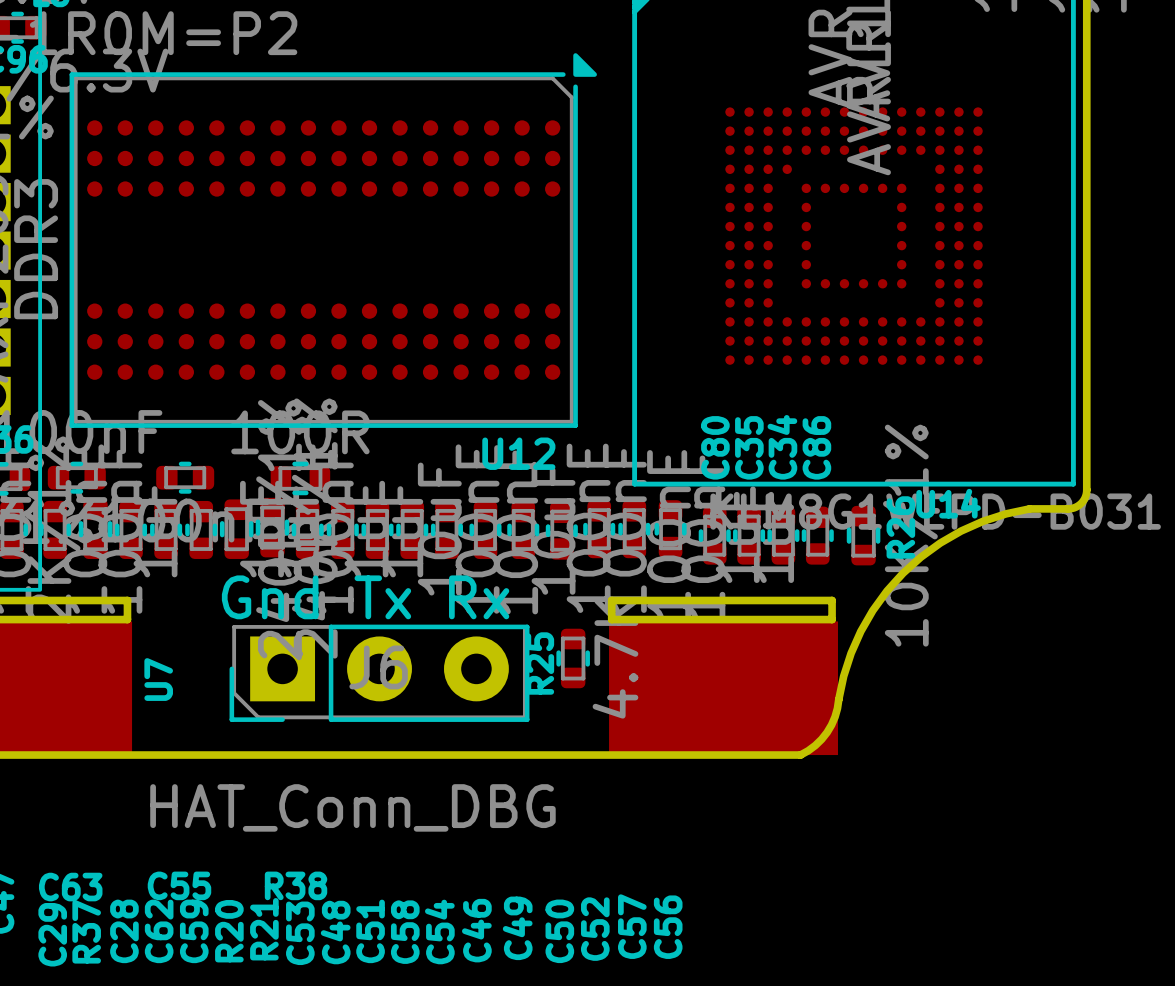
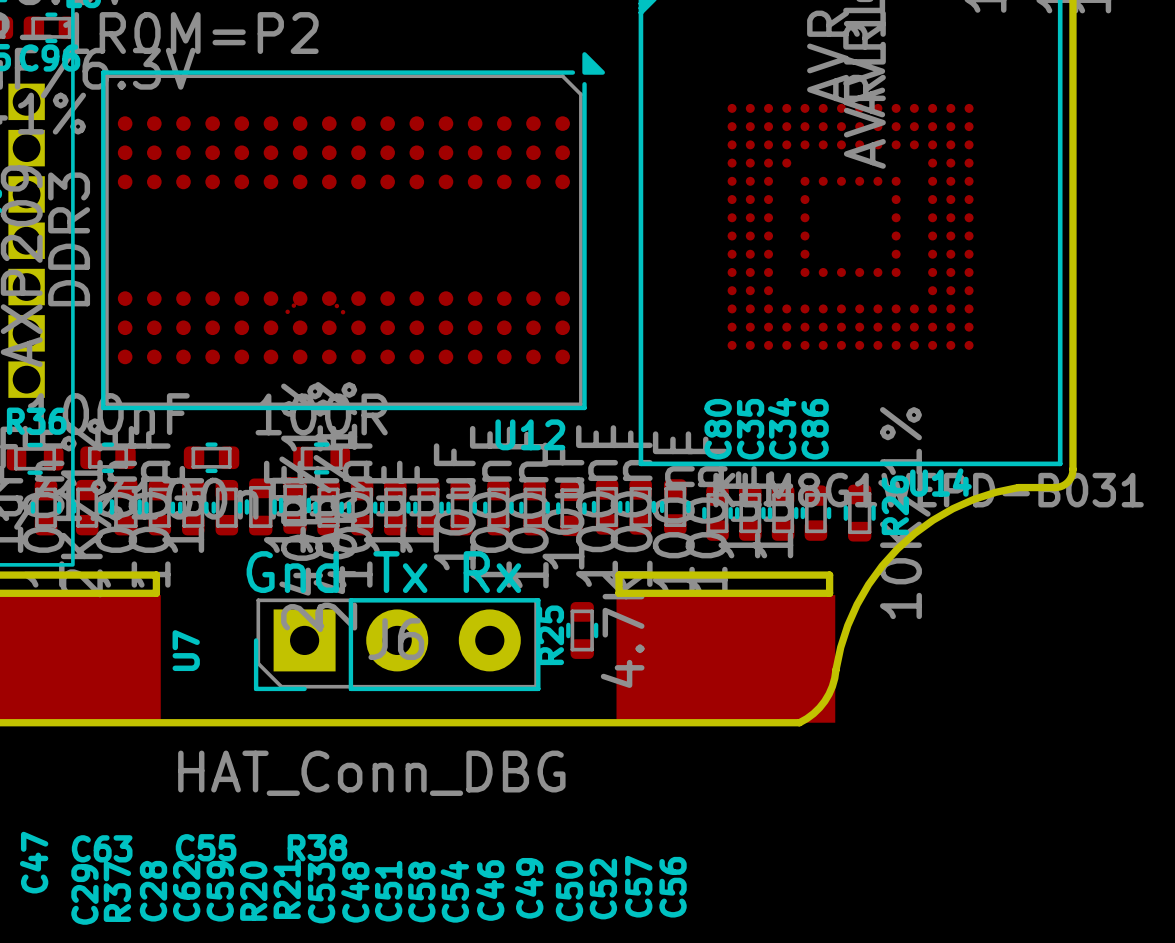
part: none -> (290, 308)
part: none -> (339, 309)

